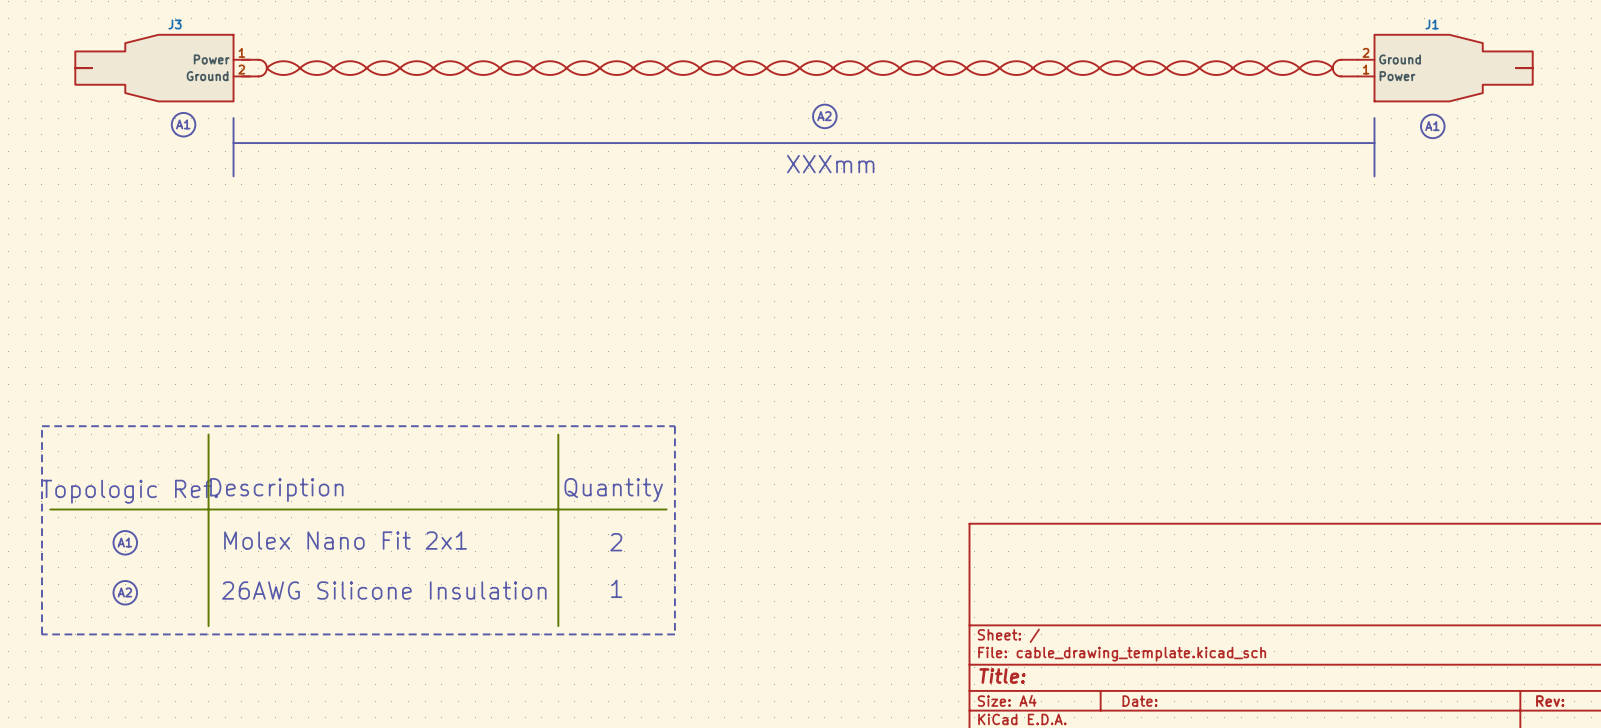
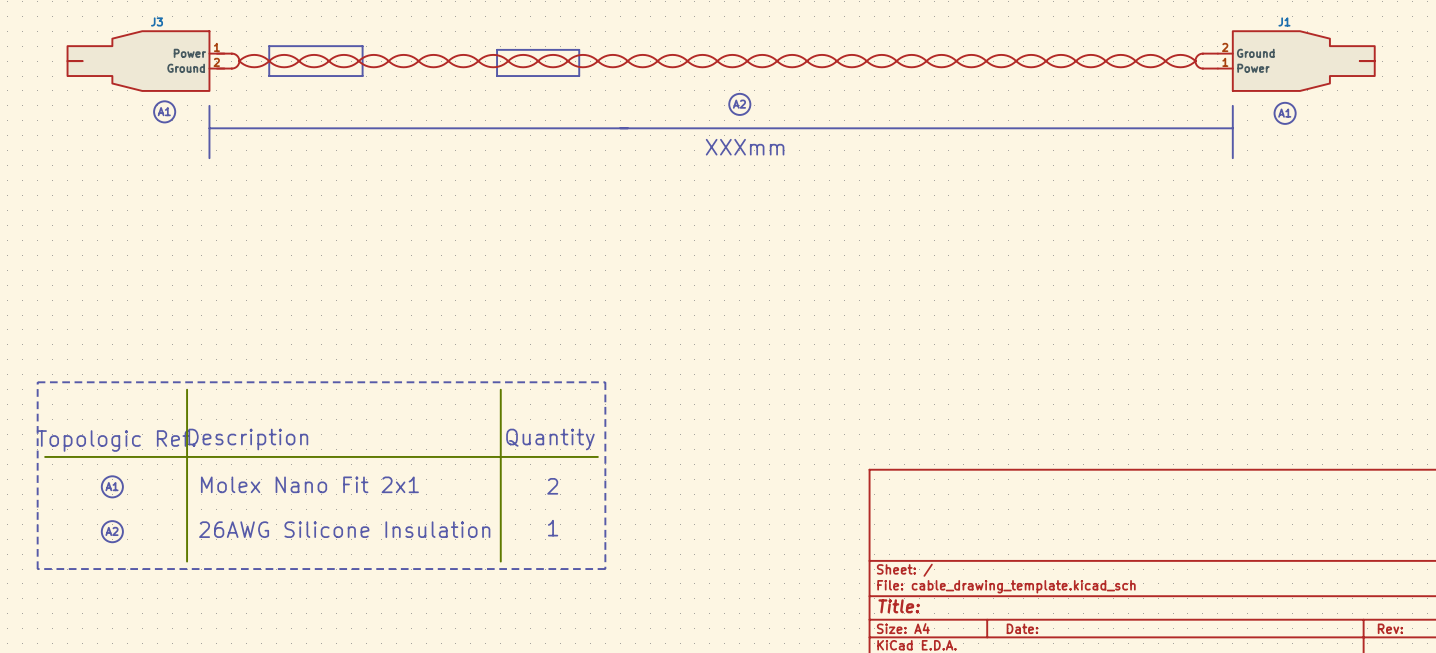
line: none -> (269, 46) (362, 46) (362, 76) (269, 76) (269, 46)
line: none -> (497, 49) (579, 49) (579, 76) (497, 76) (497, 49)

